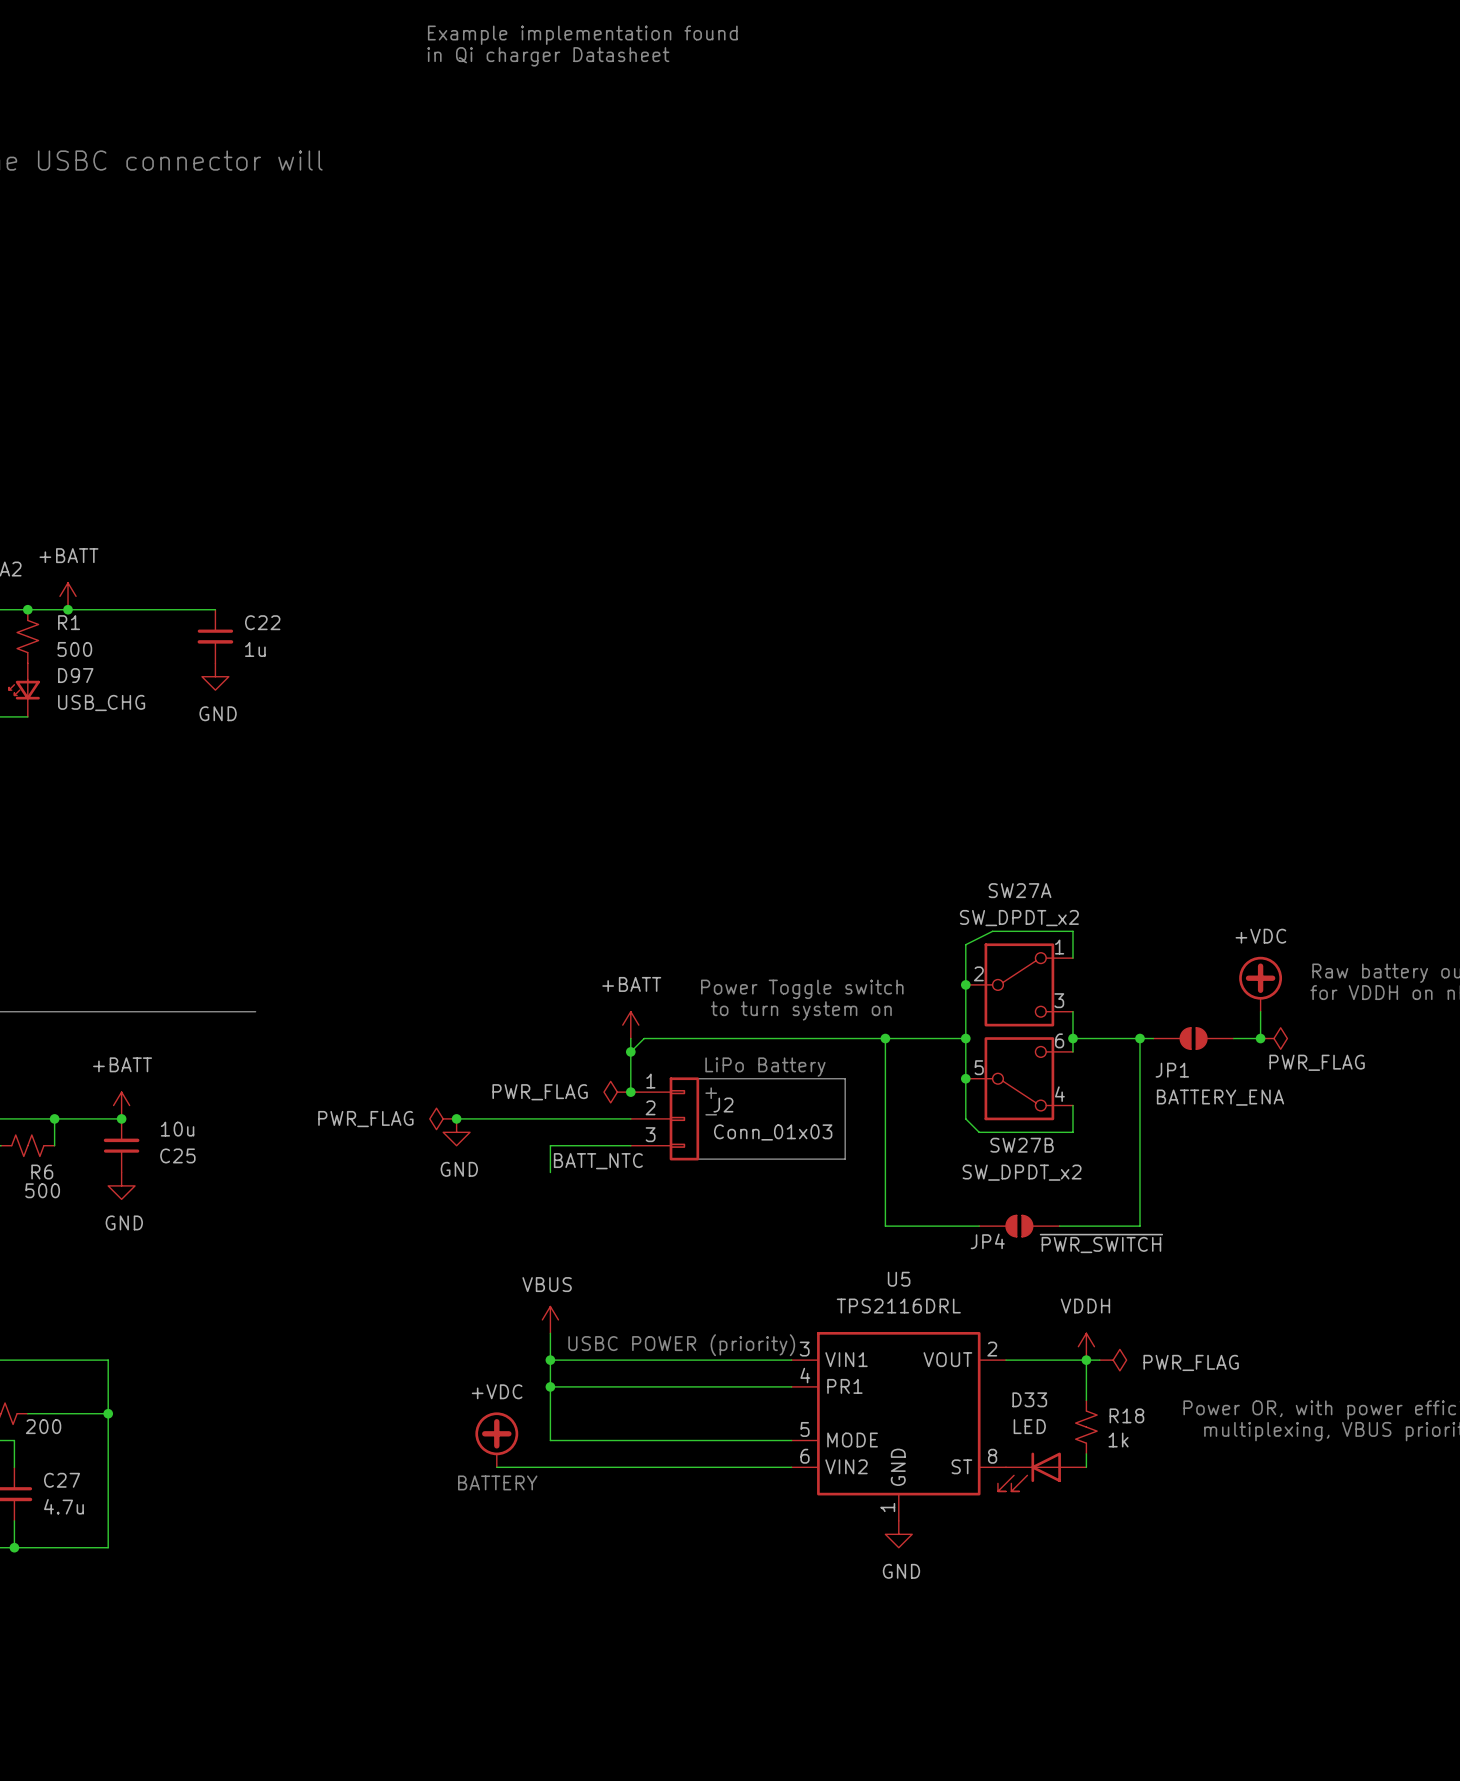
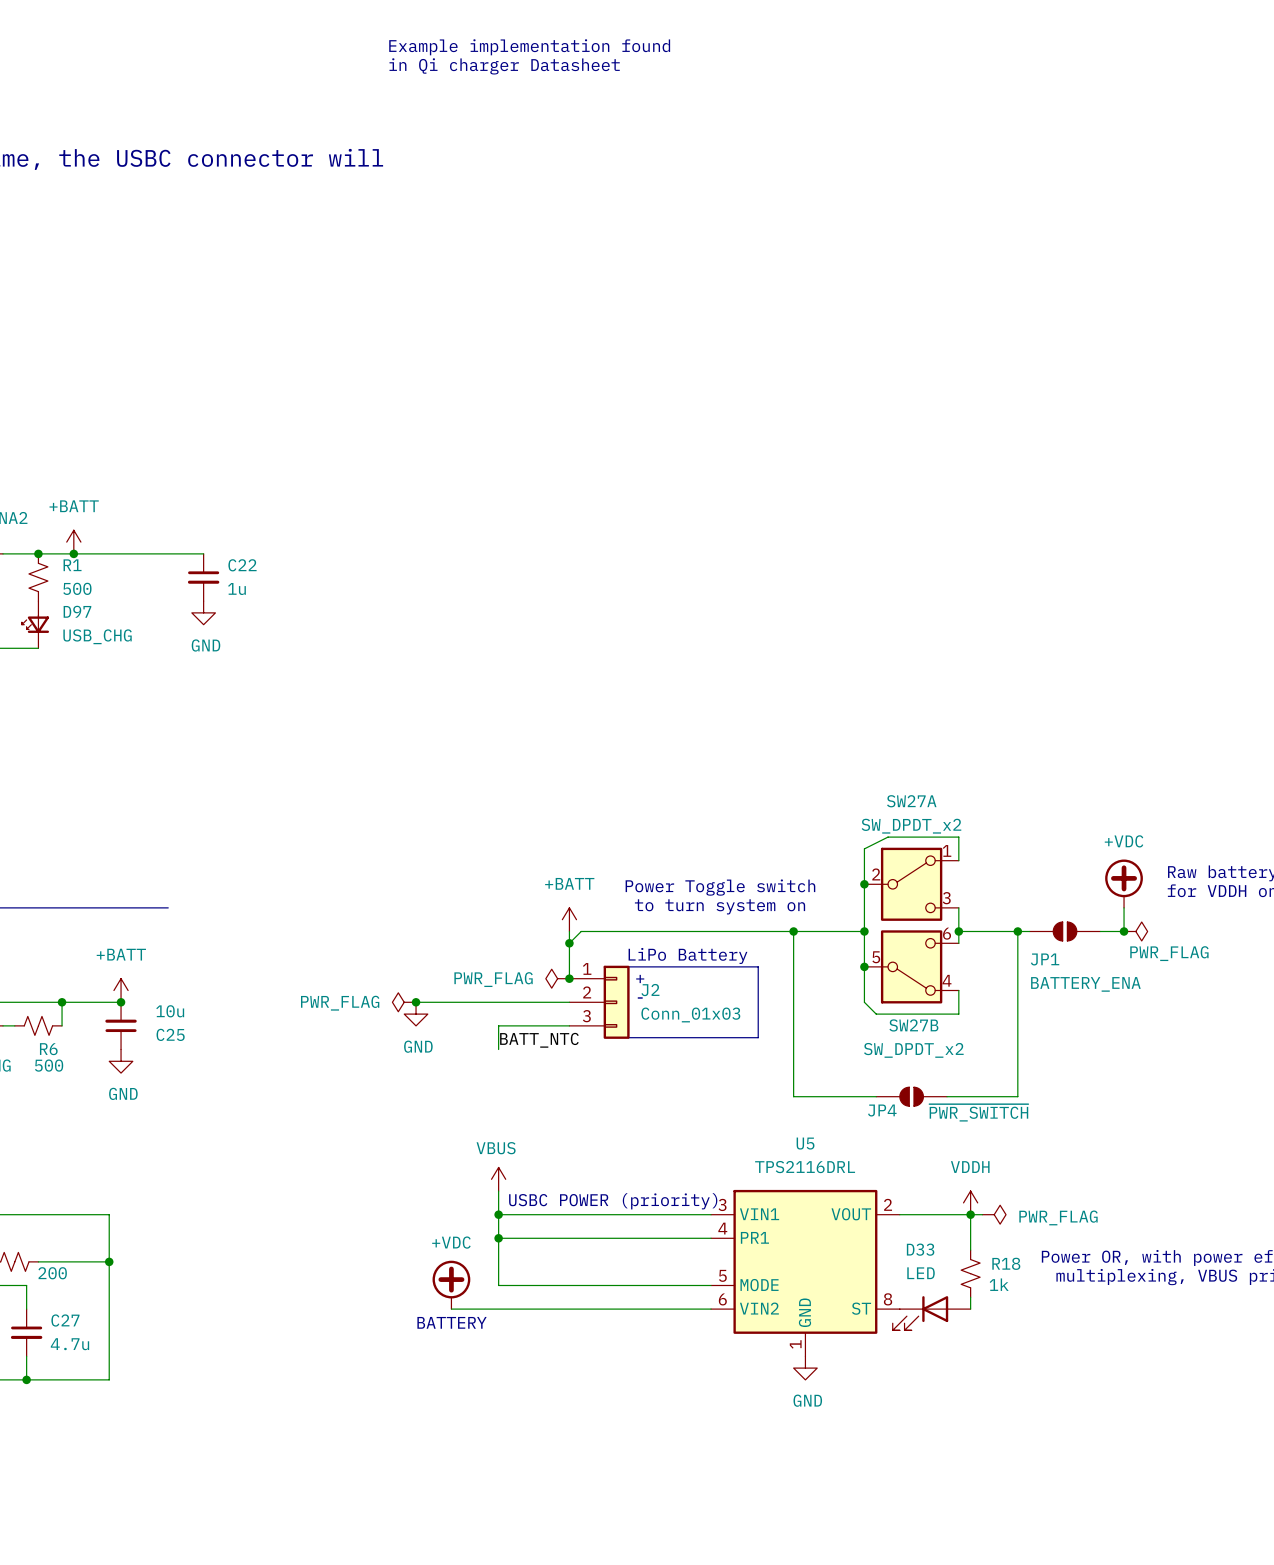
line: (175, 1011) (255, 1011) -> none

